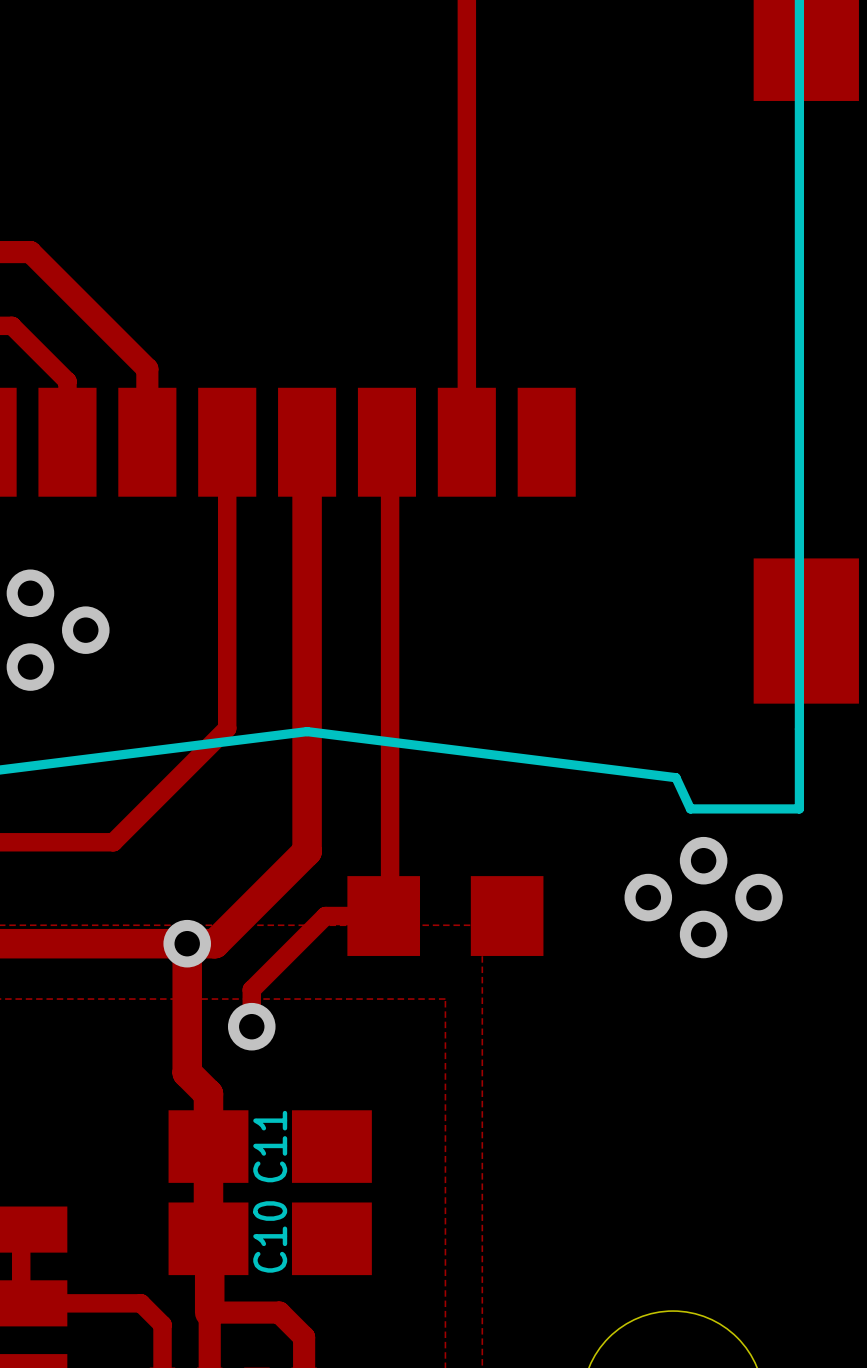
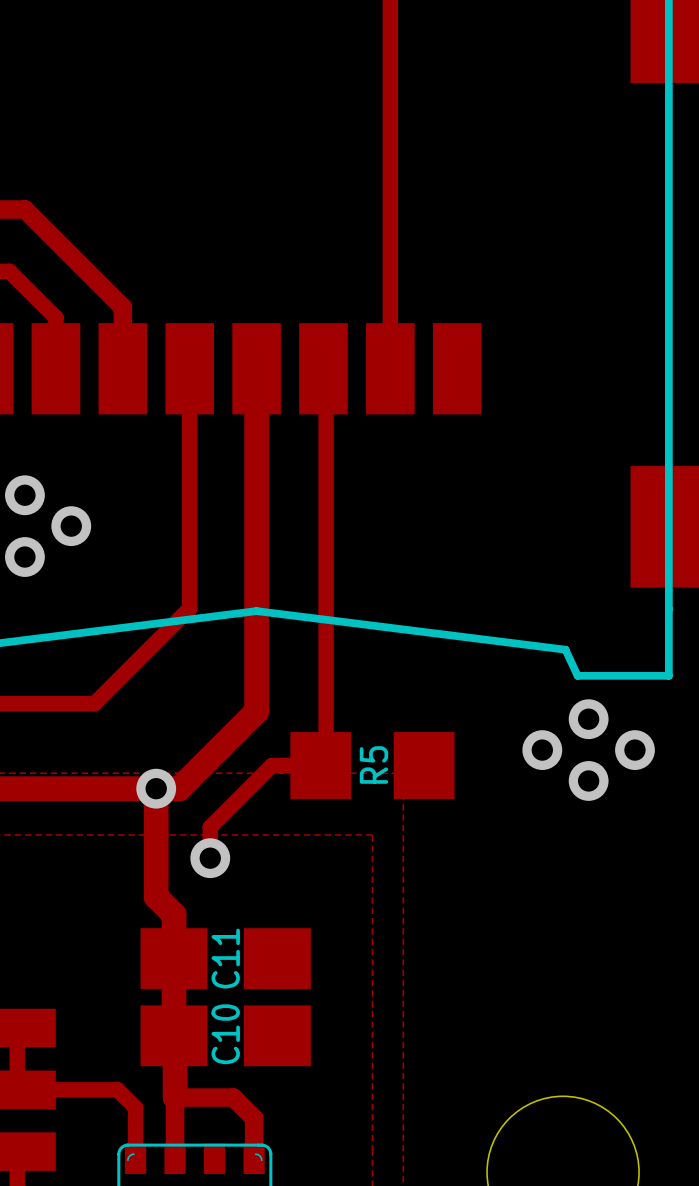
R5 name: none -> R5 (373, 764)

